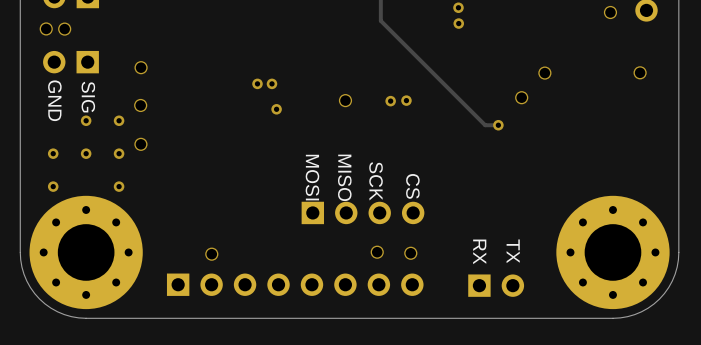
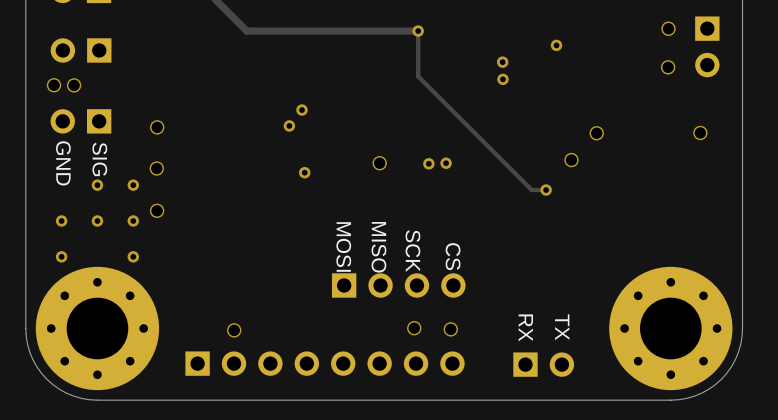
via: none -> (302, 110)
via: none -> (289, 125)
via: (257, 83) -> none
via: (271, 83) -> none

